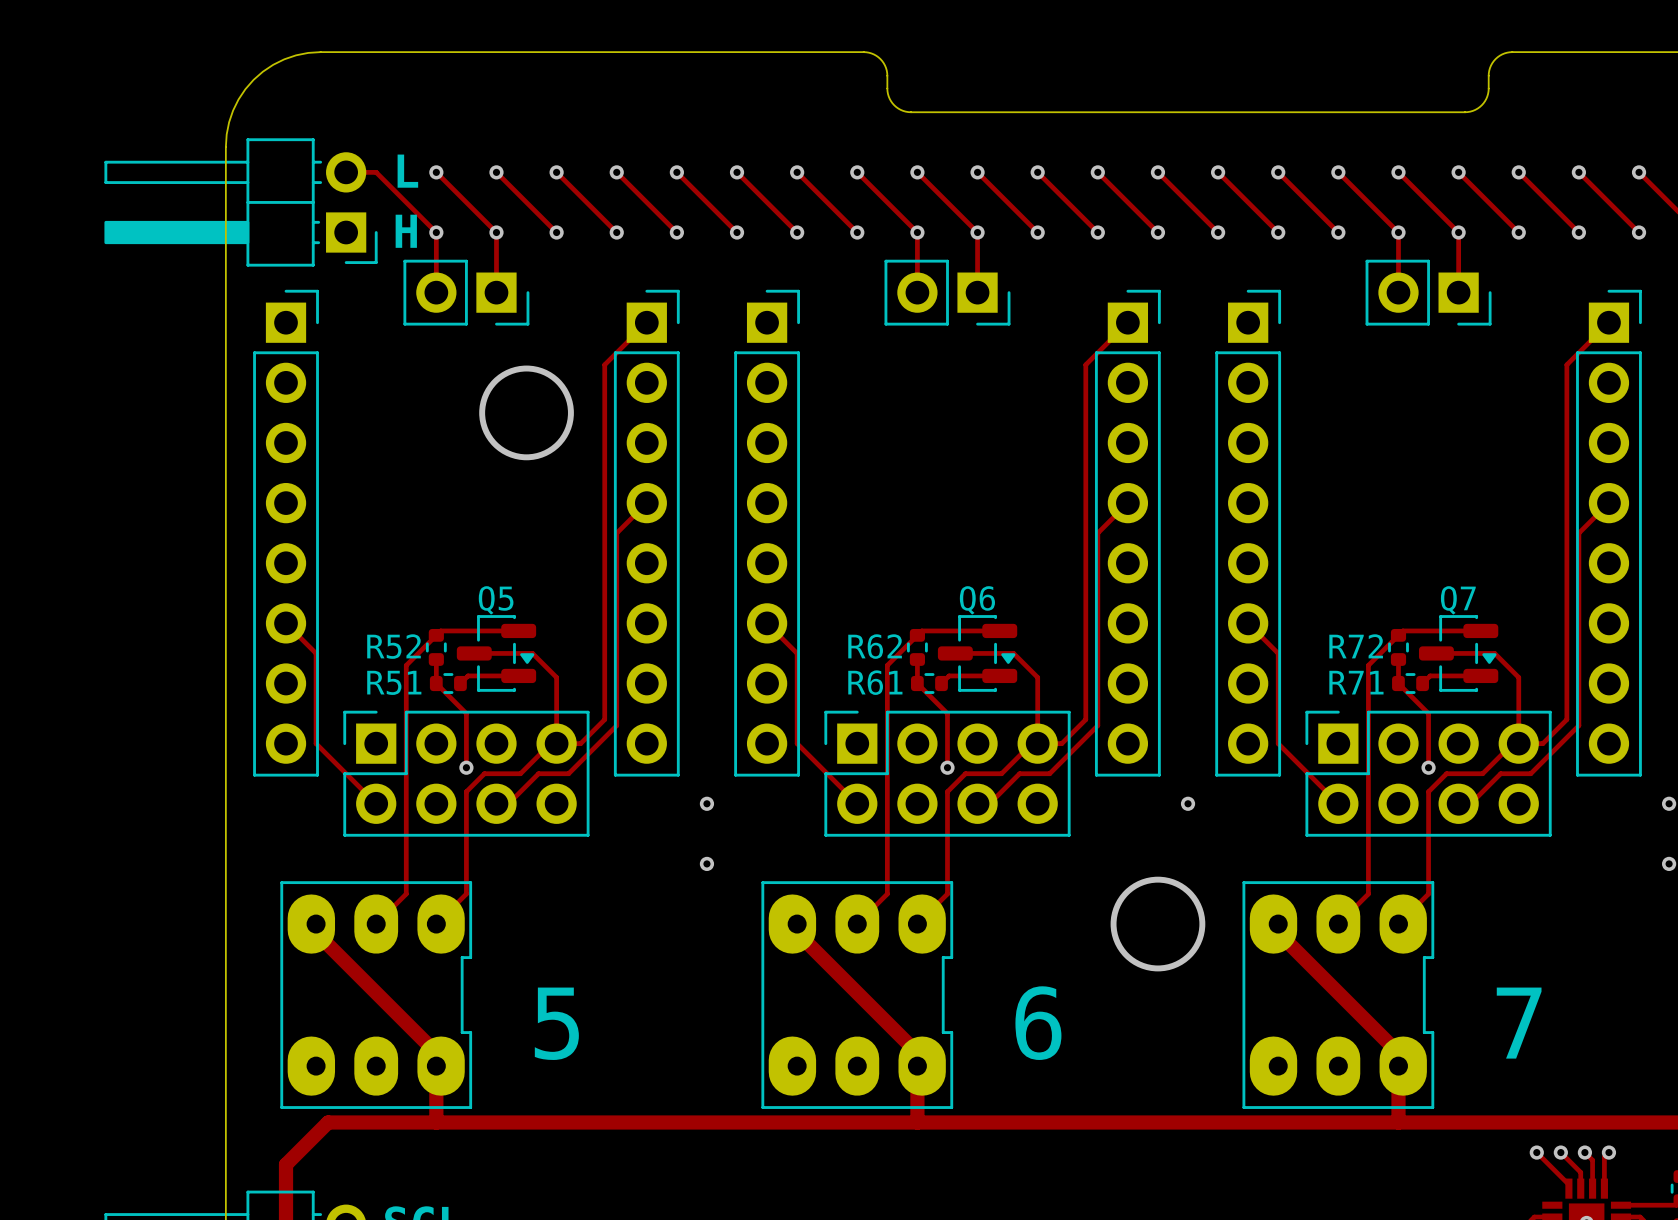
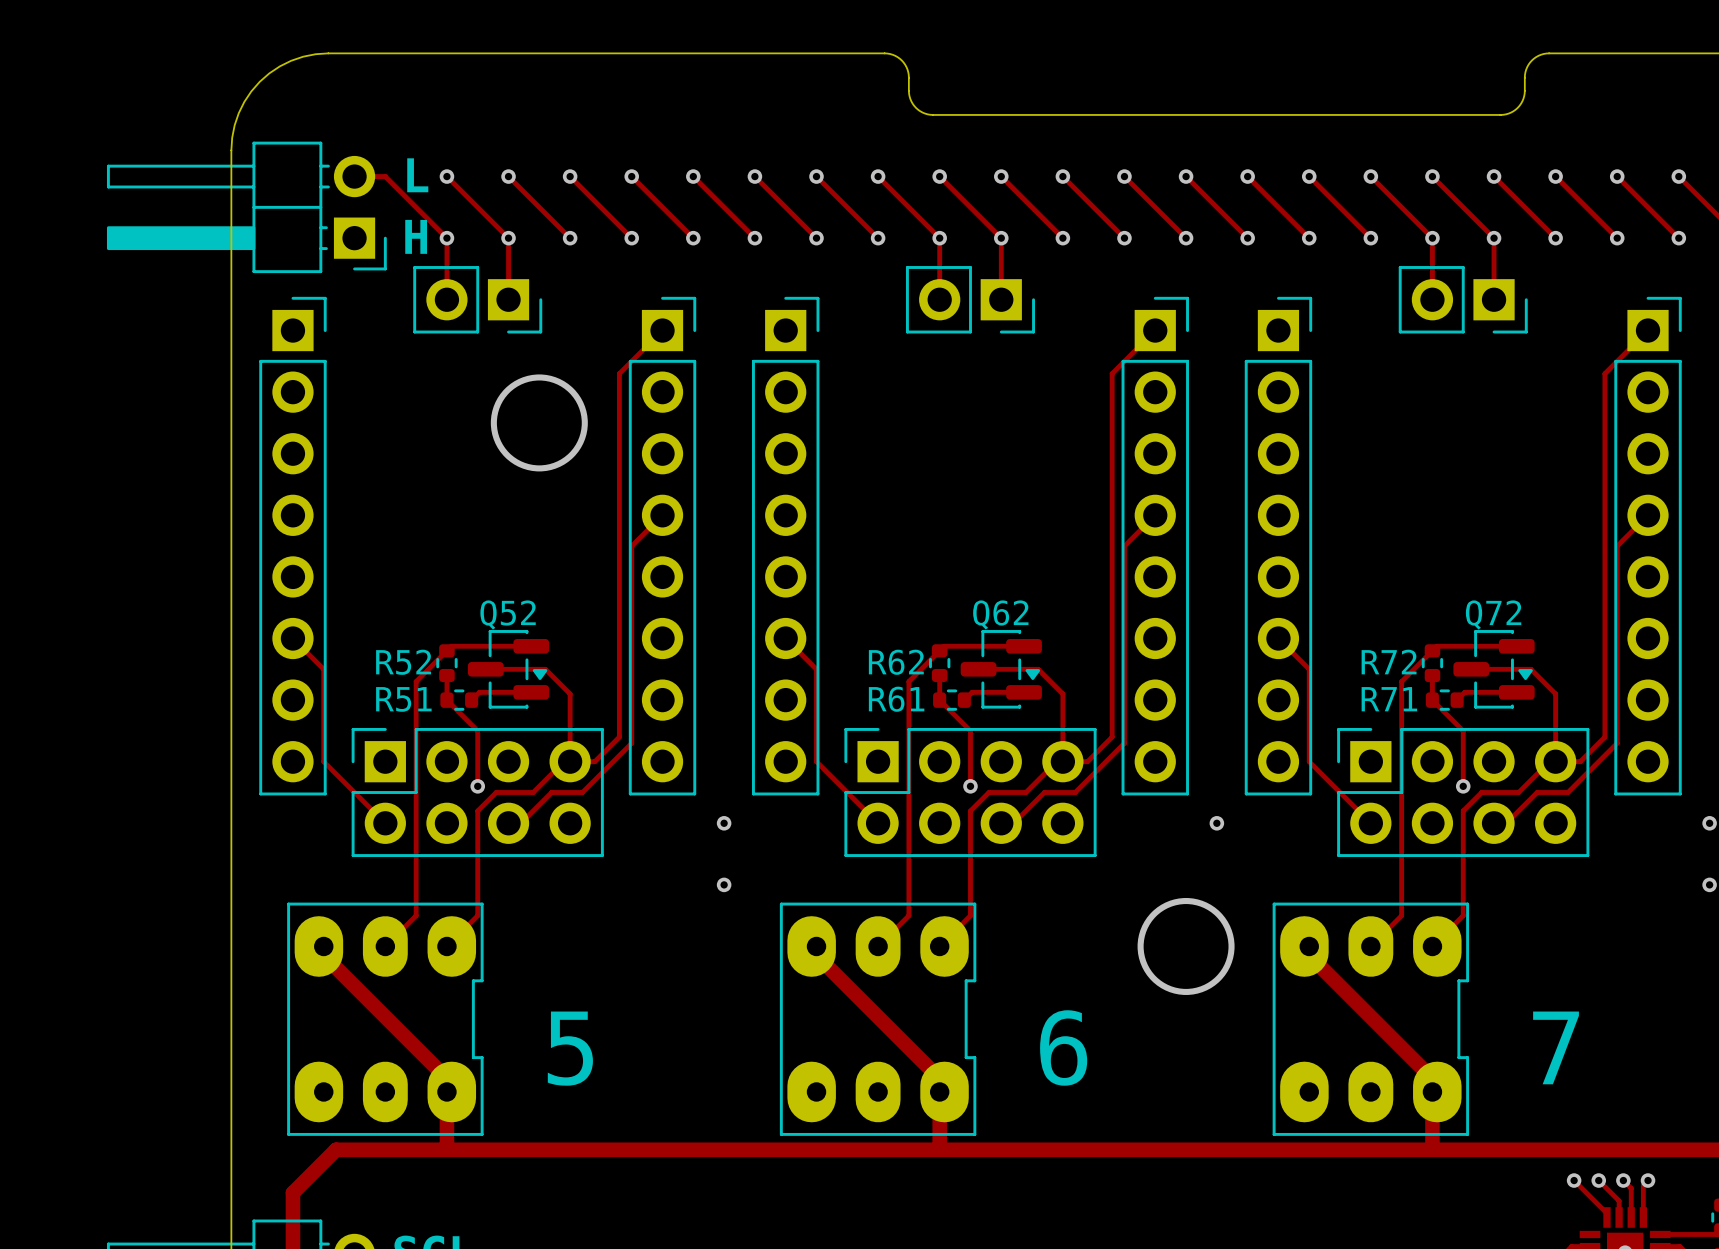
Q5 name: Q5 (496, 600) -> Q52 (508, 614)
Q6 name: Q6 (977, 600) -> Q62 (1000, 614)
Q7 name: Q7 (1458, 600) -> Q72 (1493, 614)

